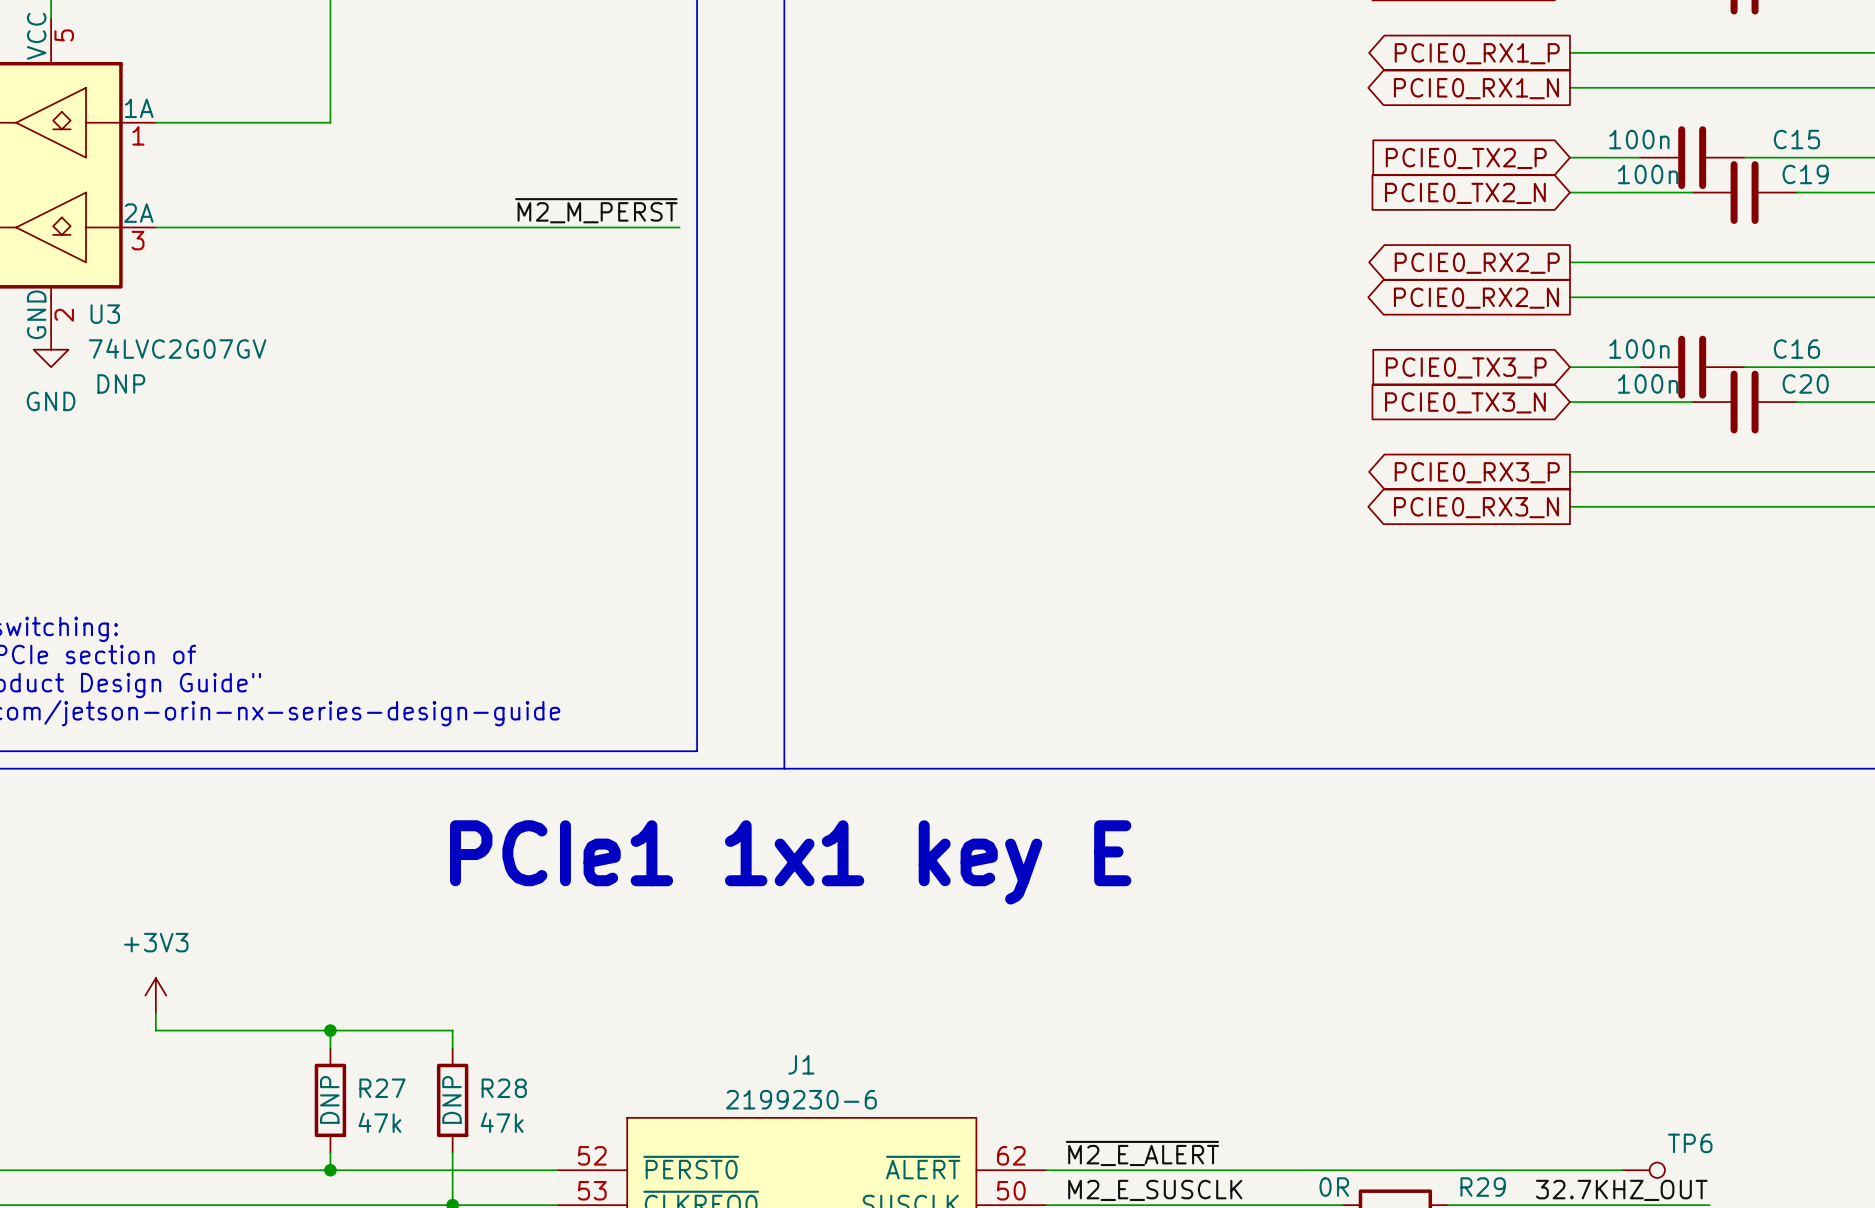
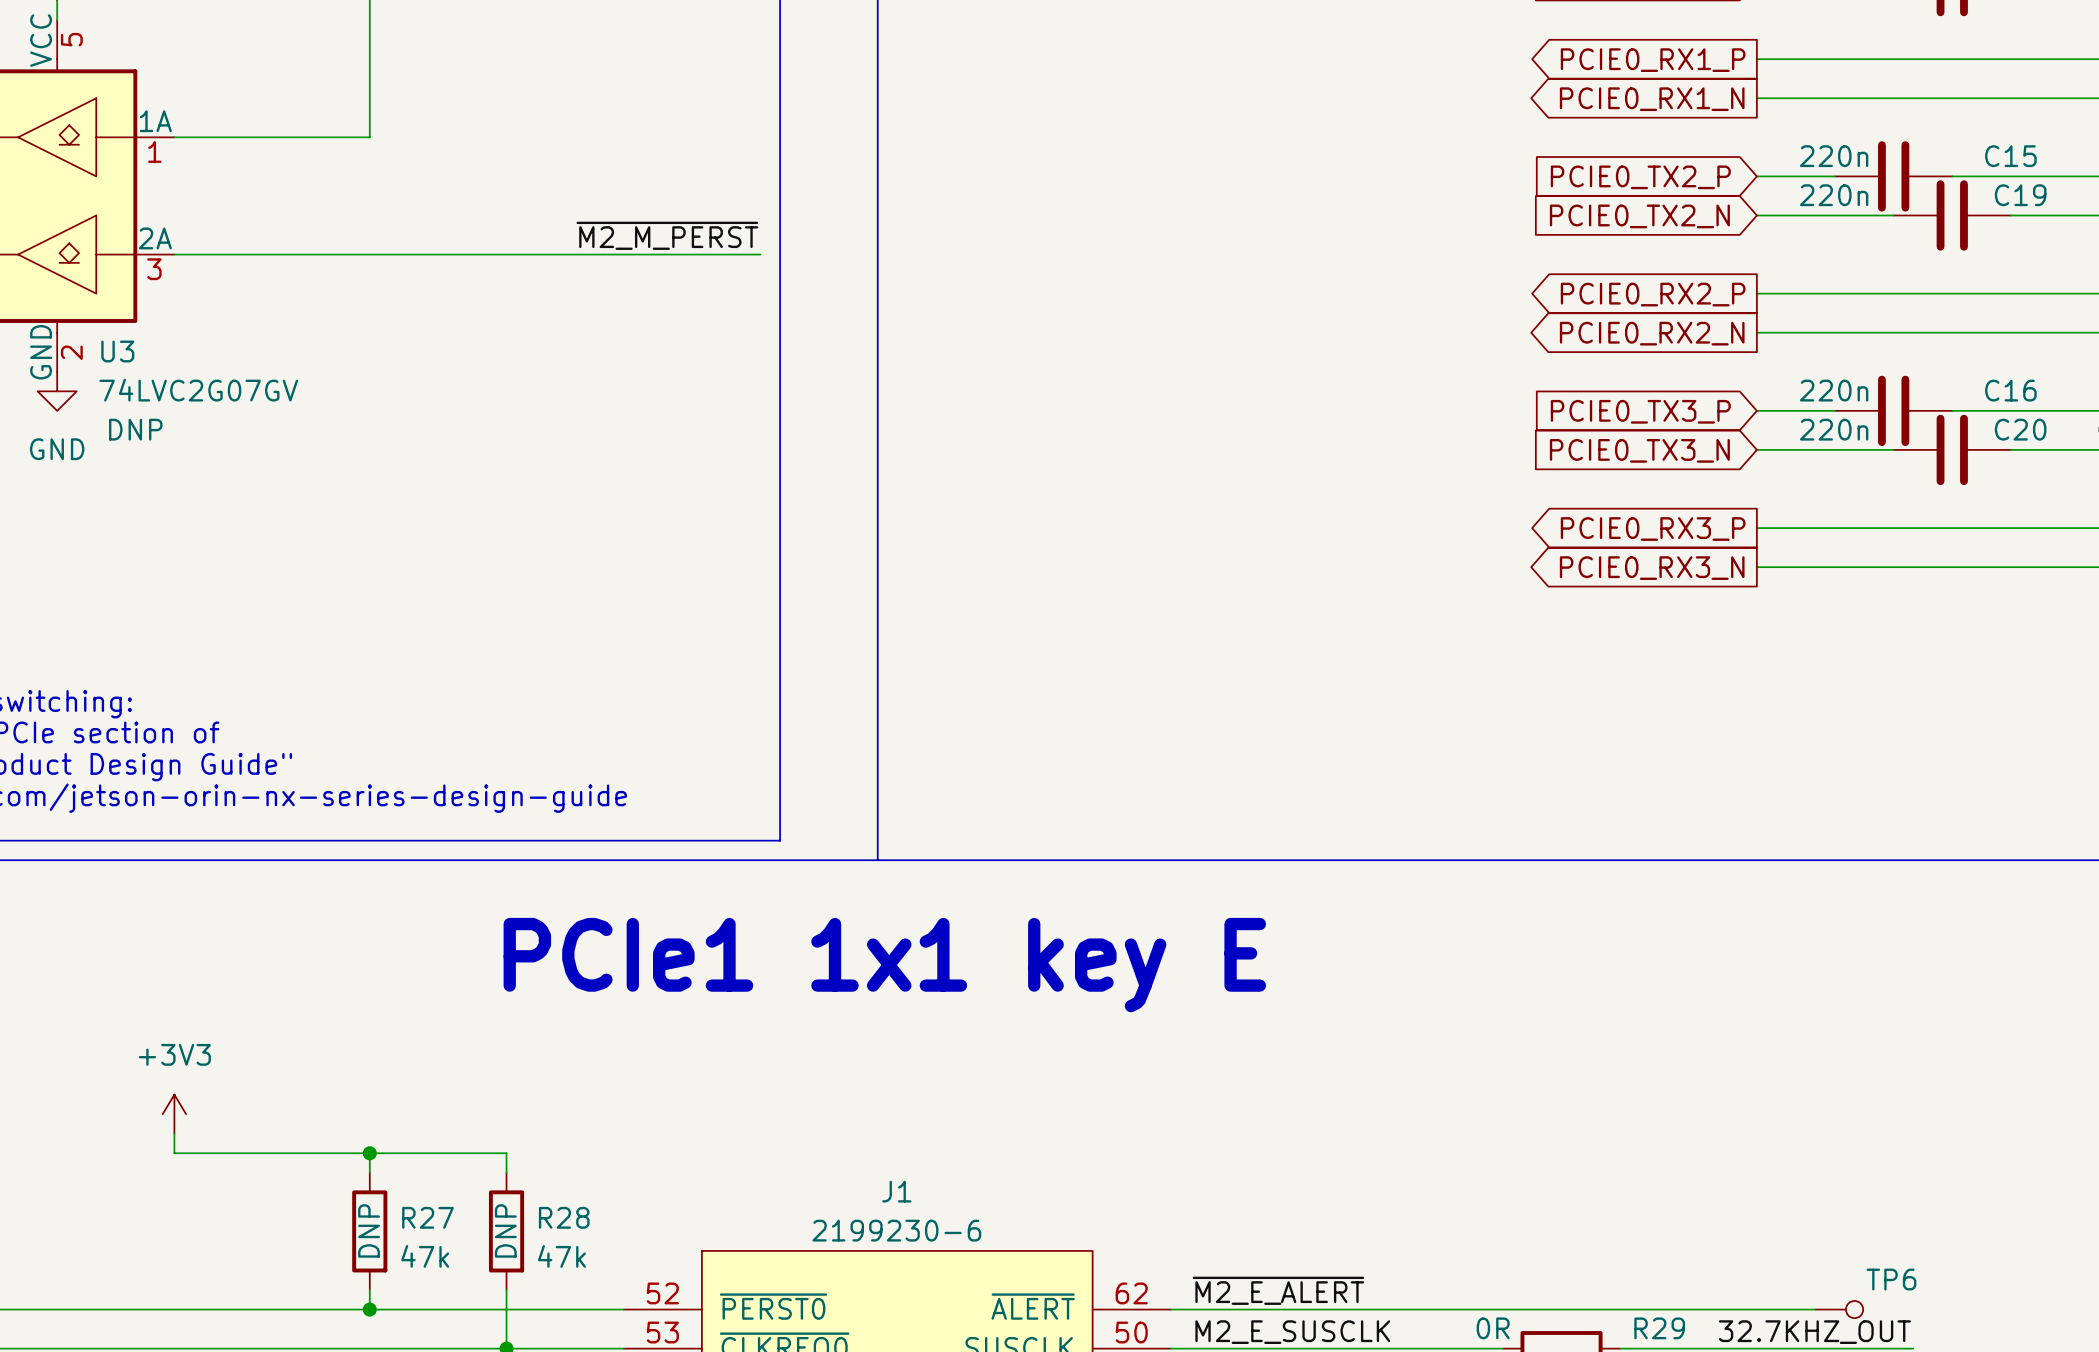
C15 text: 100n (1639, 139) -> 220n (1834, 156)
C19 text: 100n (1648, 174) -> 220n (1834, 195)
C16 text: 100n (1639, 349) -> 220n (1834, 390)
C20 text: 100n (1648, 383) -> 220n (1834, 429)

